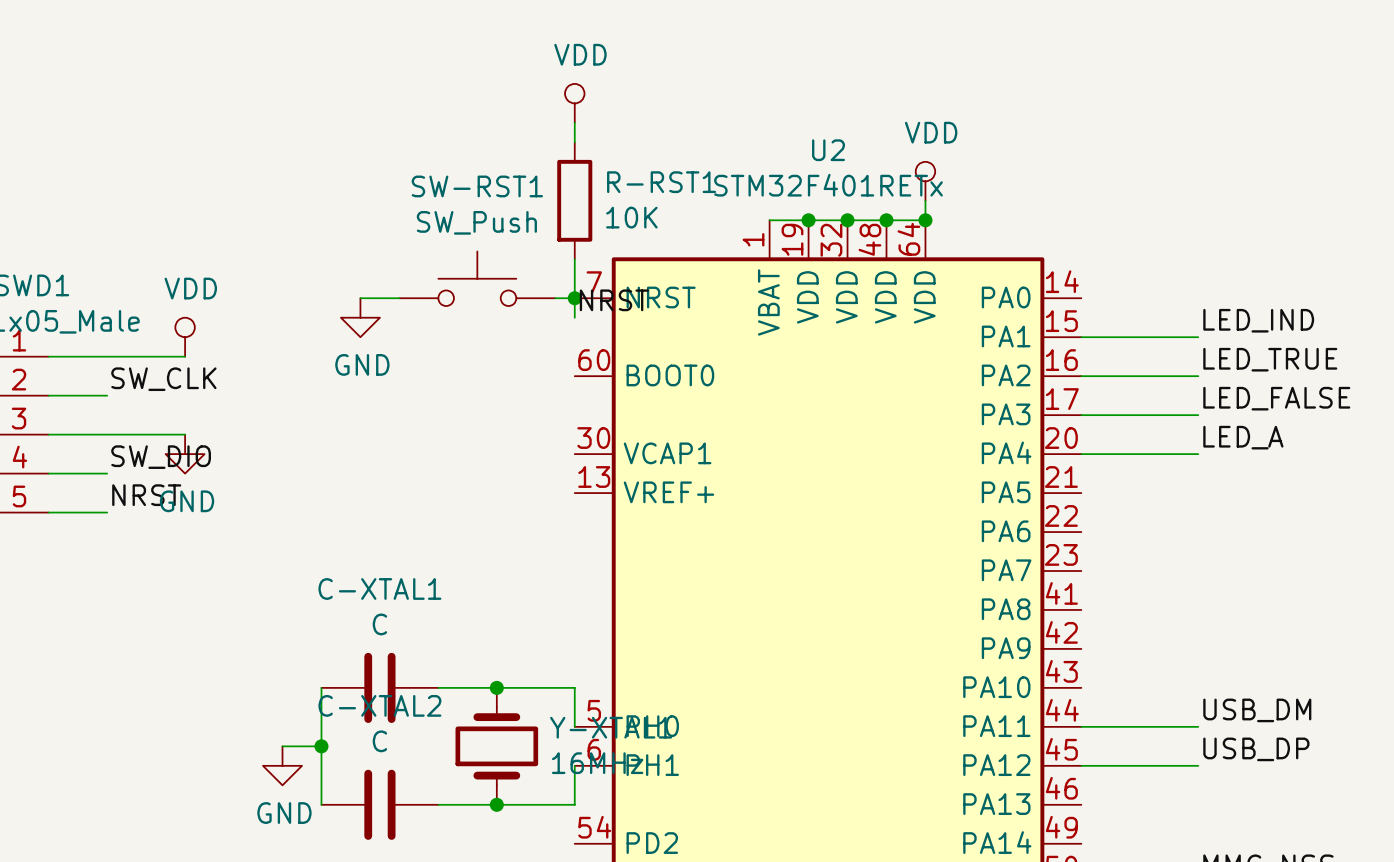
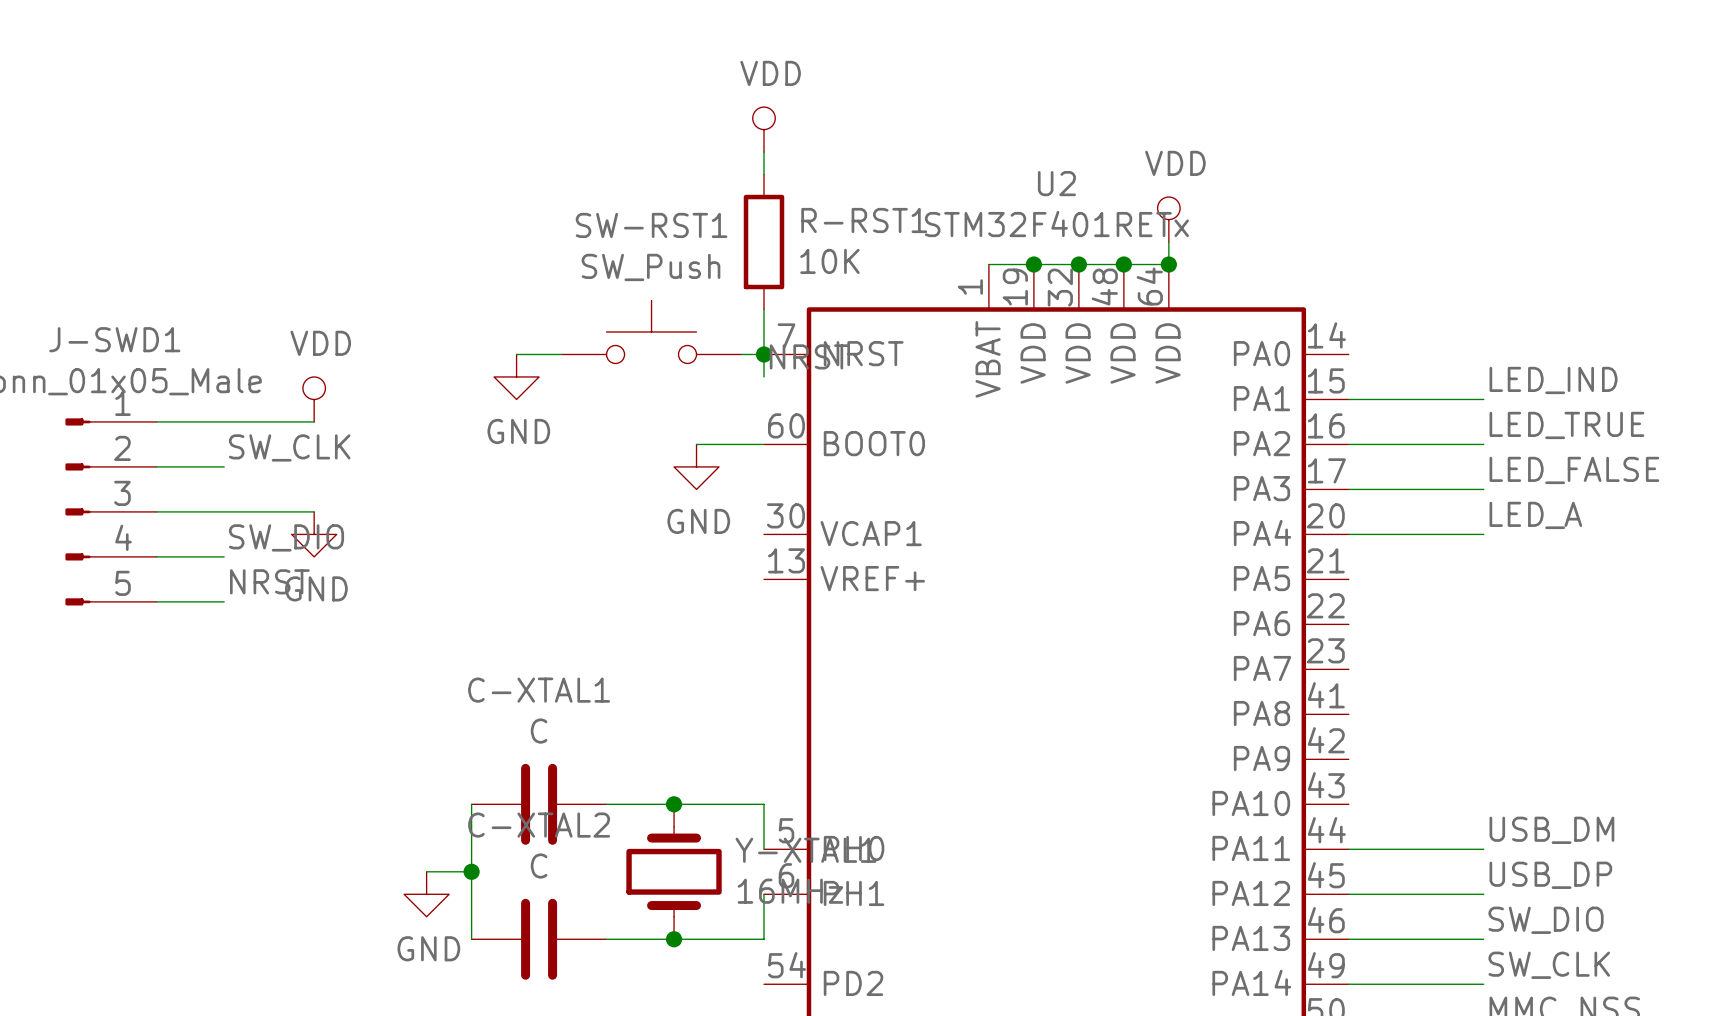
wire: none -> (696, 444) (764, 444)
power symbol: none -> GND (696, 466)
label: none -> SW_DIO (1546, 920)
wire: none -> (1348, 939) (1483, 939)
label: none -> SW_CLK (1549, 965)
wire: none -> (1348, 984) (1483, 984)

